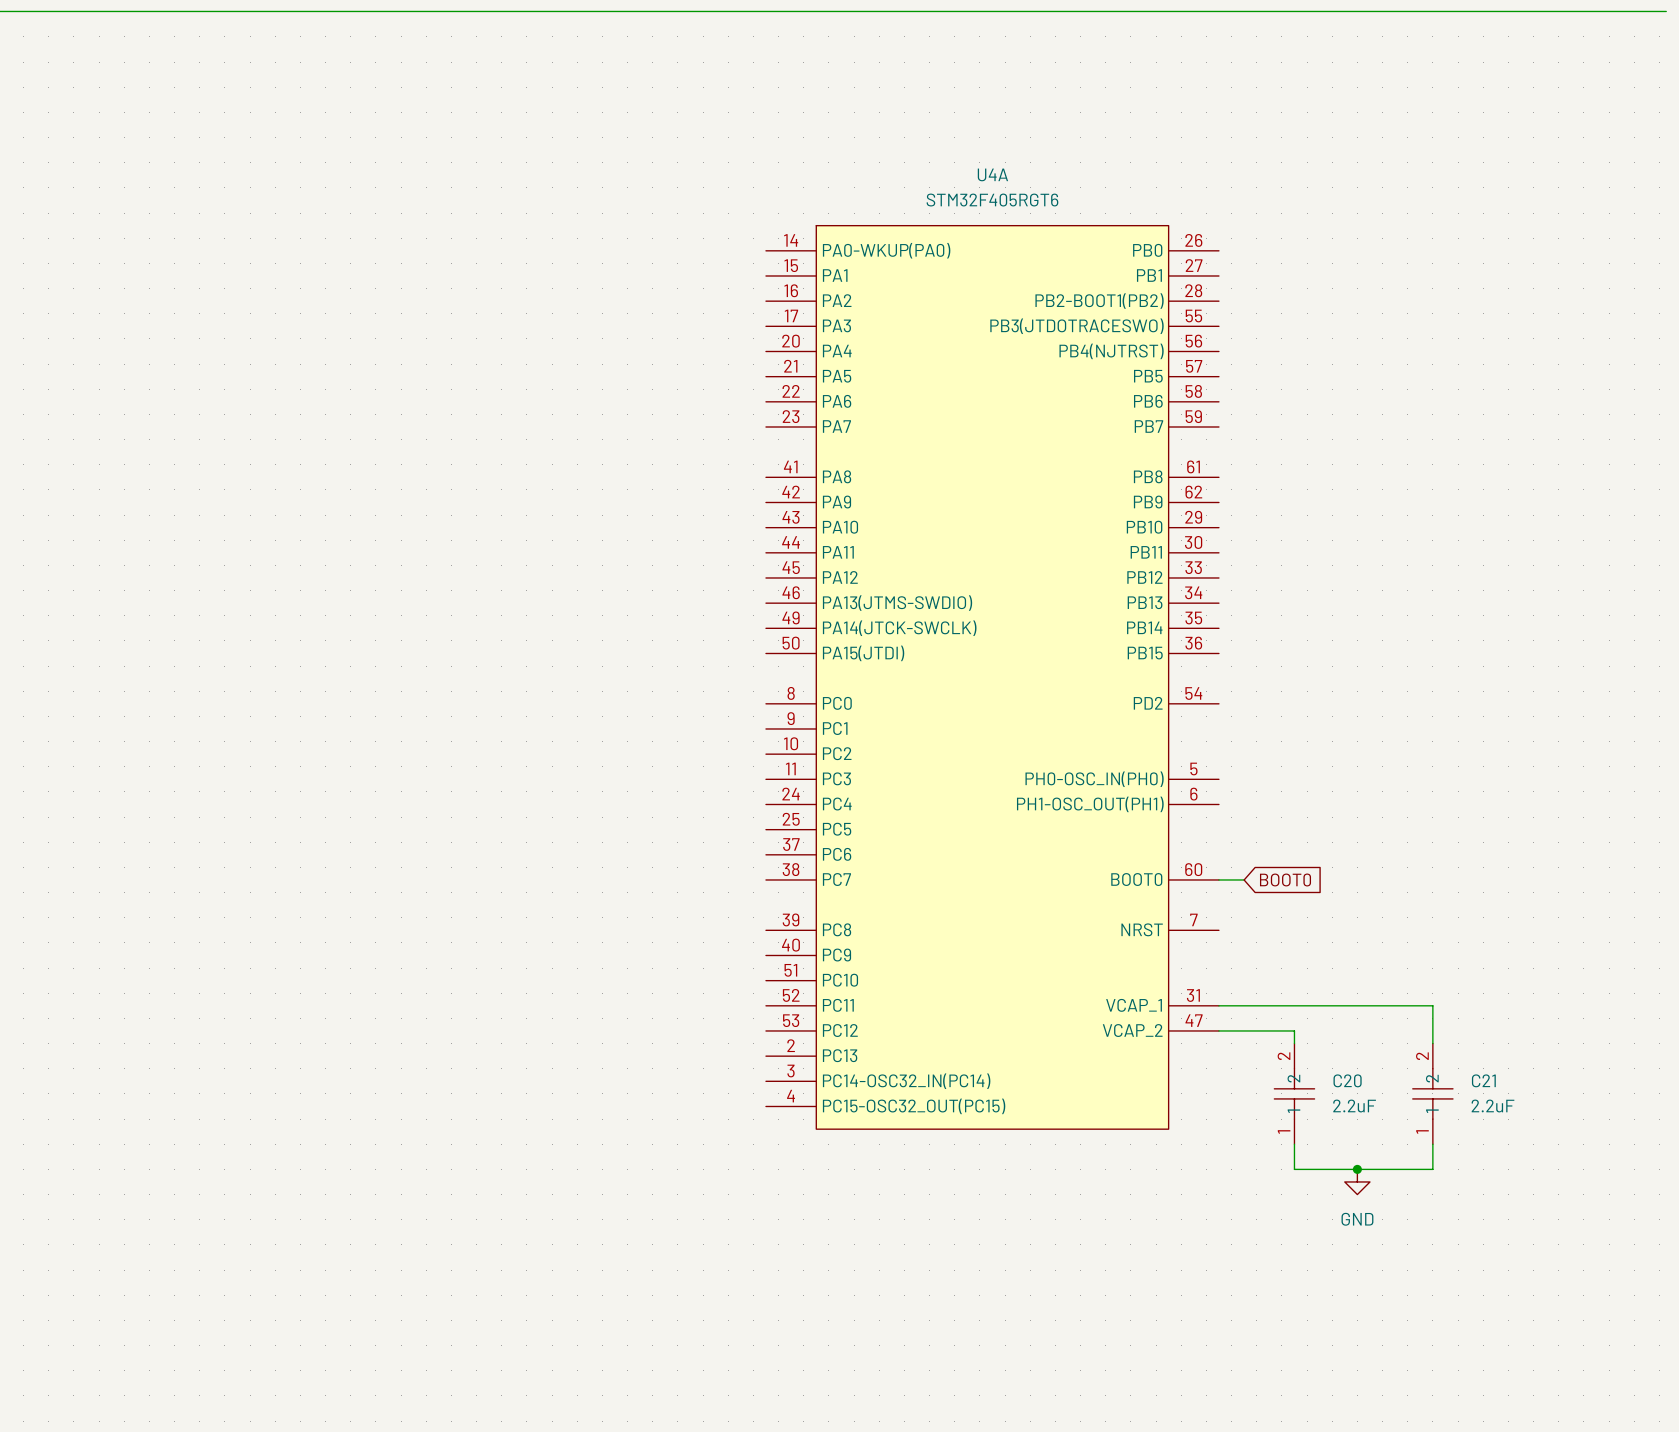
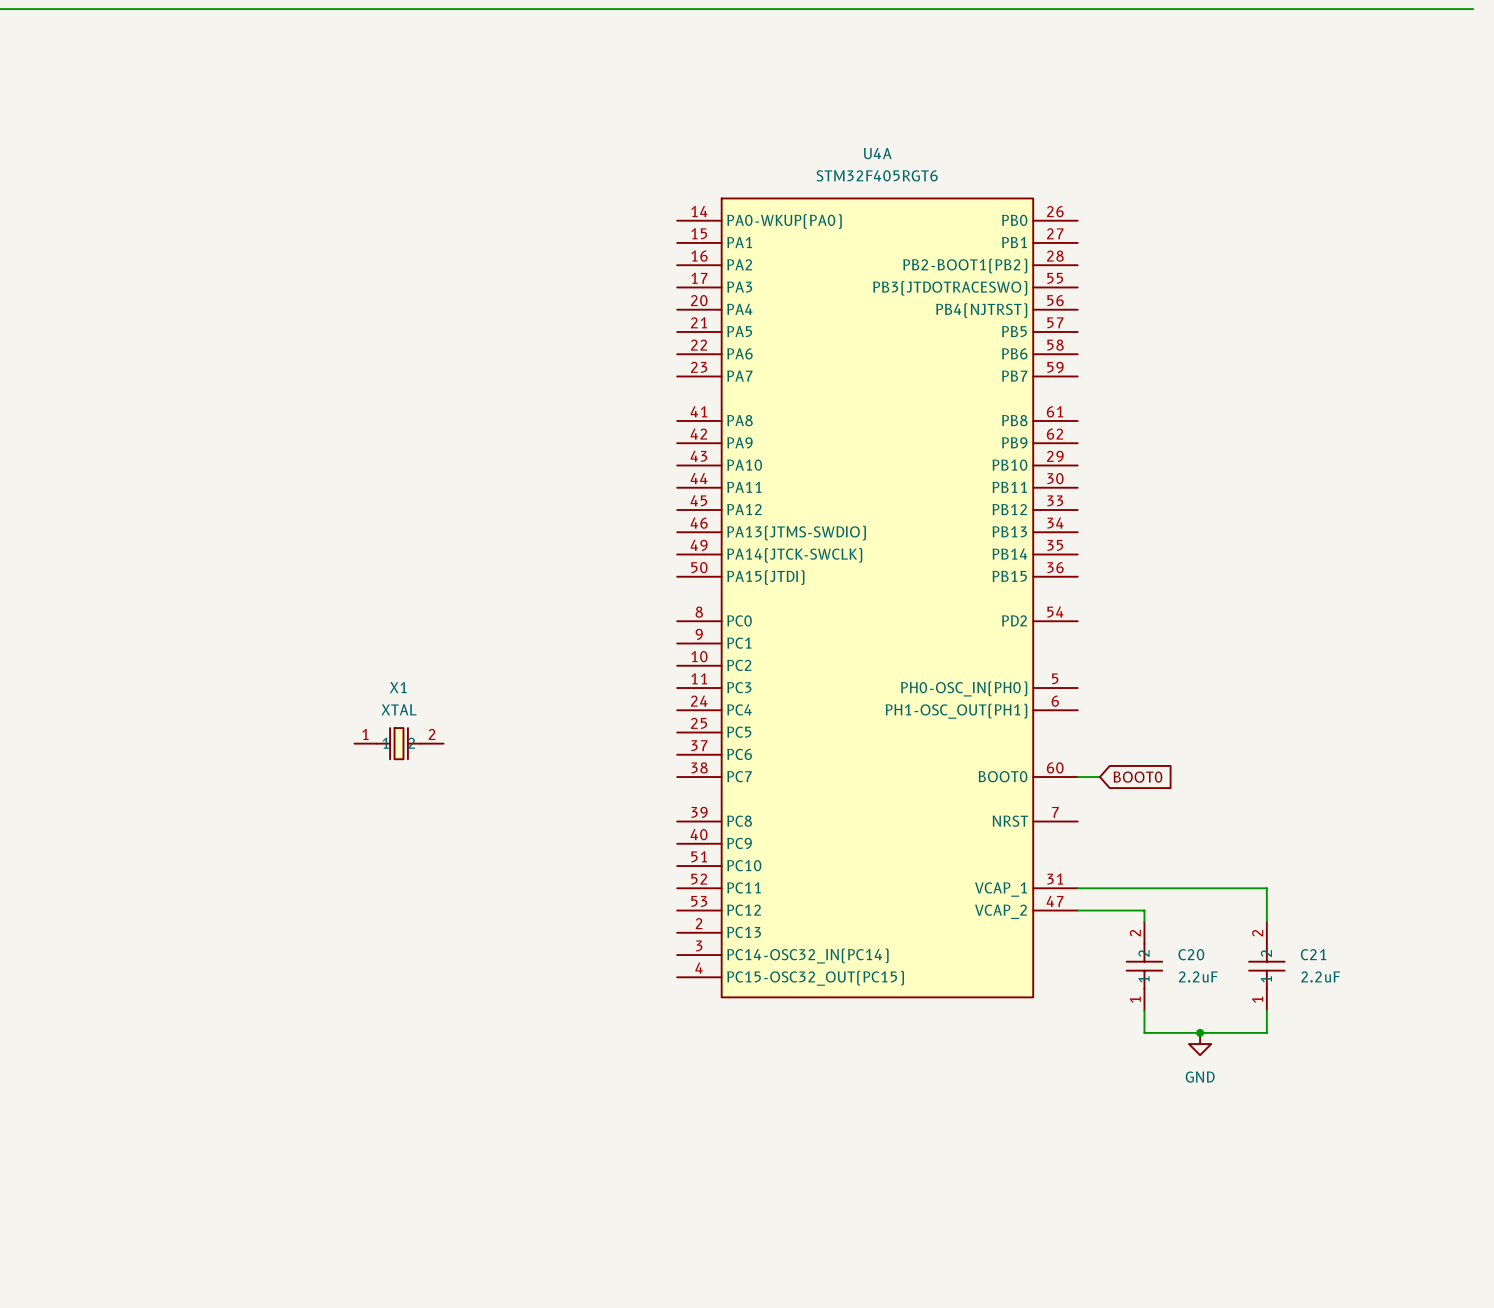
X1: none -> XTAL (399, 743)

